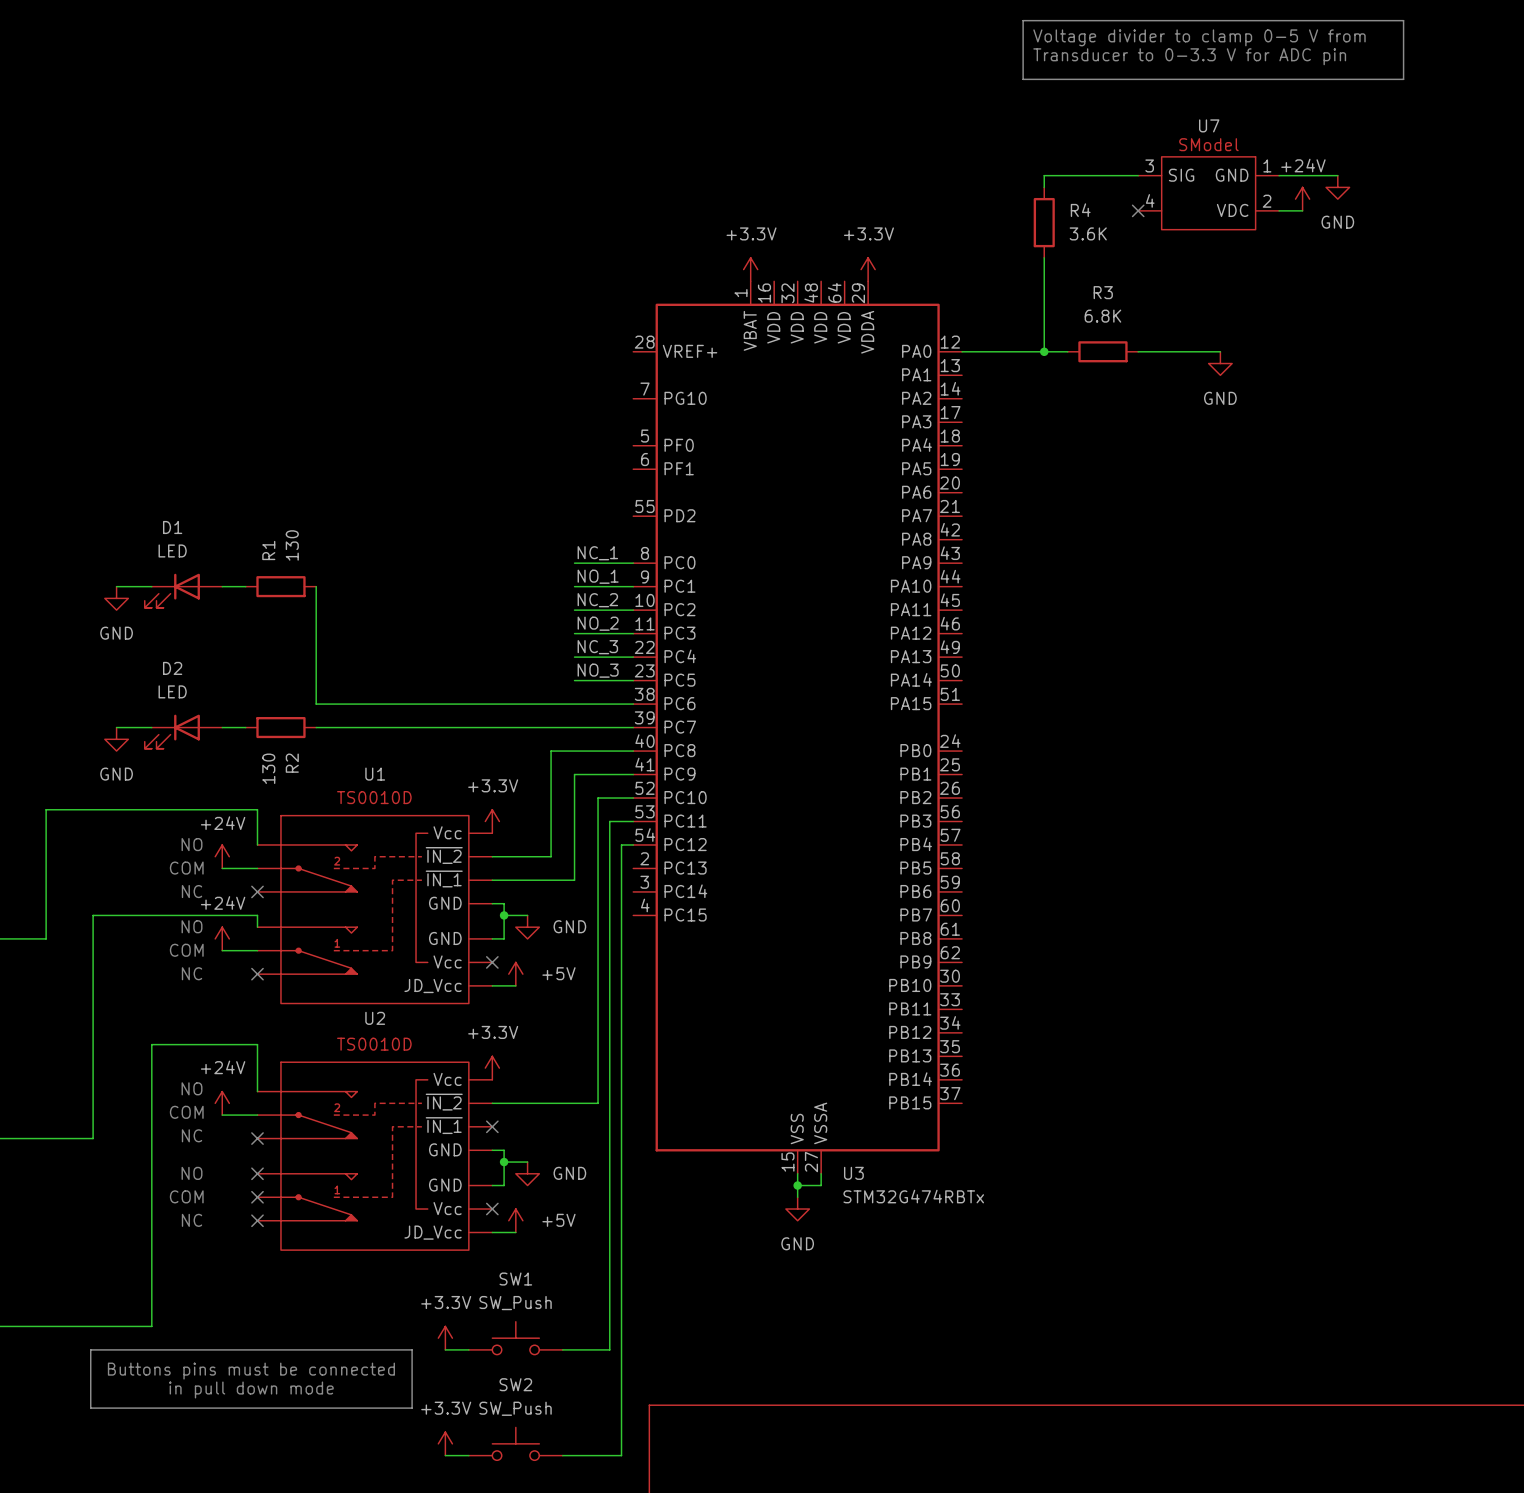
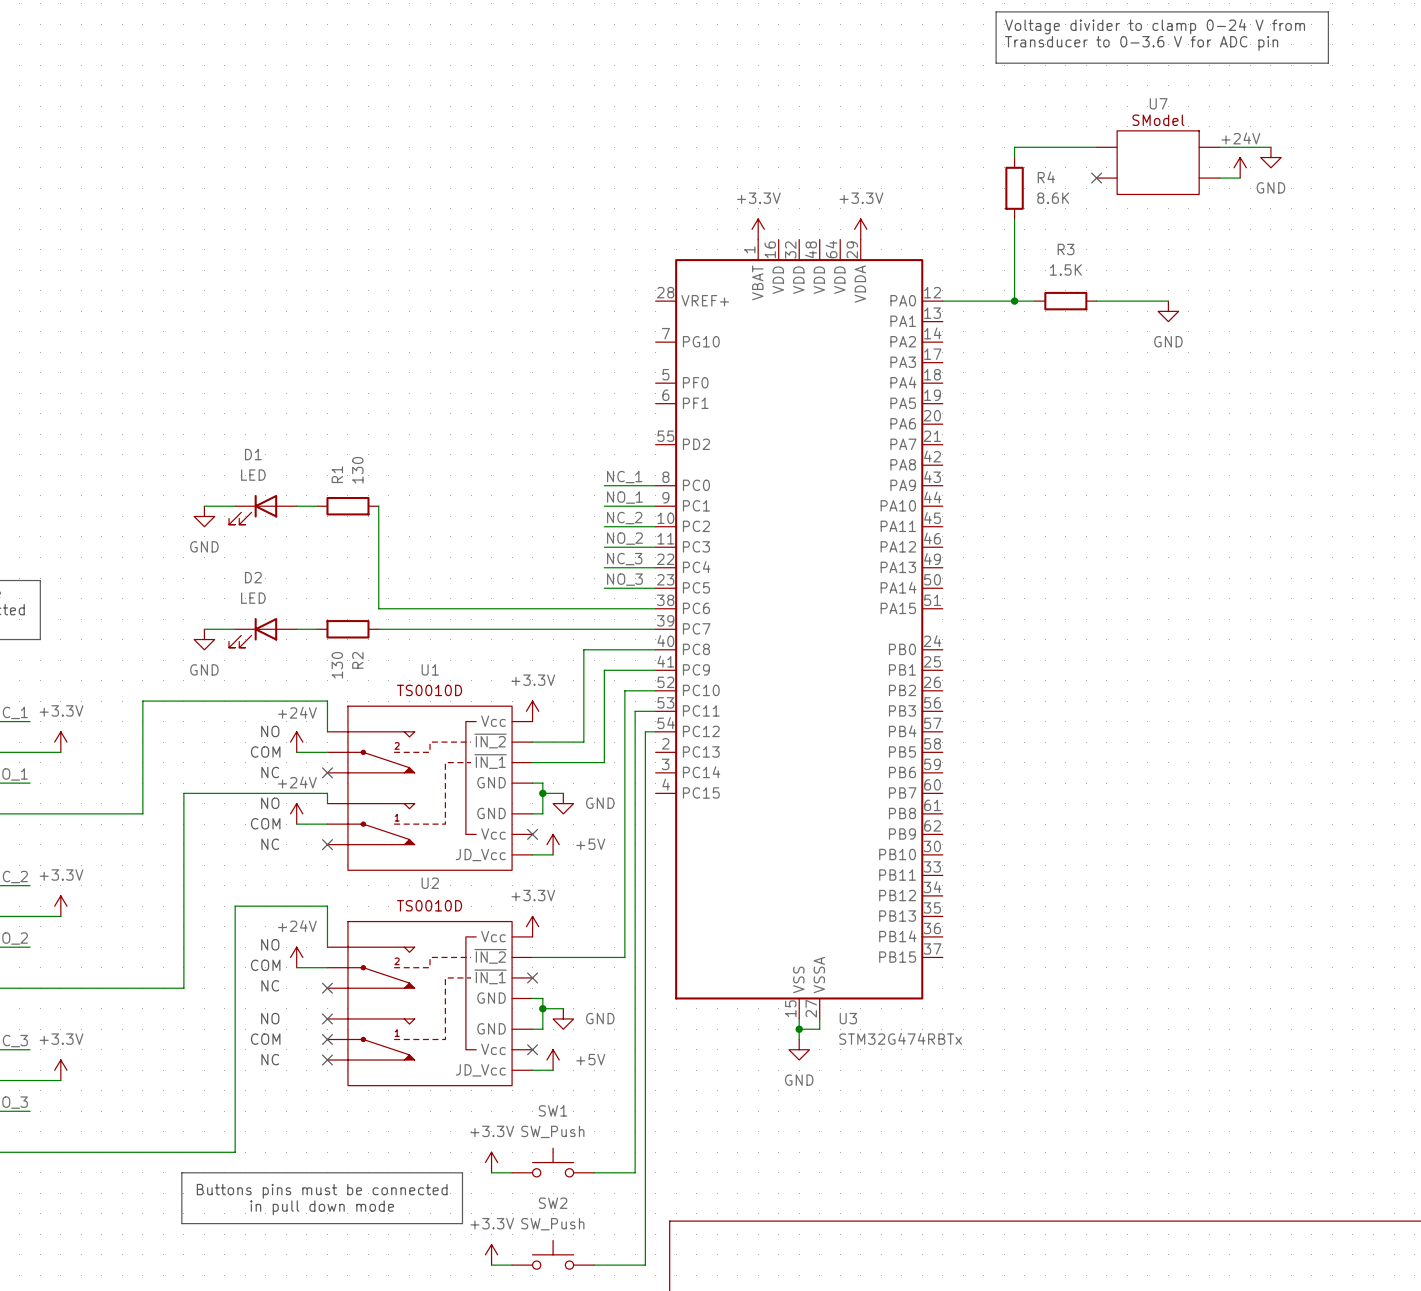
text: Voltage divider to clamp 0-5 V from (1199, 37) -> Voltage divider to clamp 0-24 V from (1155, 26)
text: Transducer to 0-3.3 V for ADC pin (1189, 56) -> Transducer to 0-3.6 V for ADC pin (1141, 43)
U7 pin number: 3 (1149, 165) -> none
U7 pin number: 1 (1267, 165) -> none
U7 pin name: SIG (1181, 175) -> none
U7 pin name: GND (1232, 175) -> none
U7 pin number: 4 (1150, 200) -> none
U7 pin number: 2 (1267, 201) -> none
U7 pin name: VDC (1232, 210) -> none
R4 value: 3.6K (1088, 233) -> 8.6K (1053, 198)
R3 value: 6.8K (1102, 316) -> 1.5K (1065, 269)

